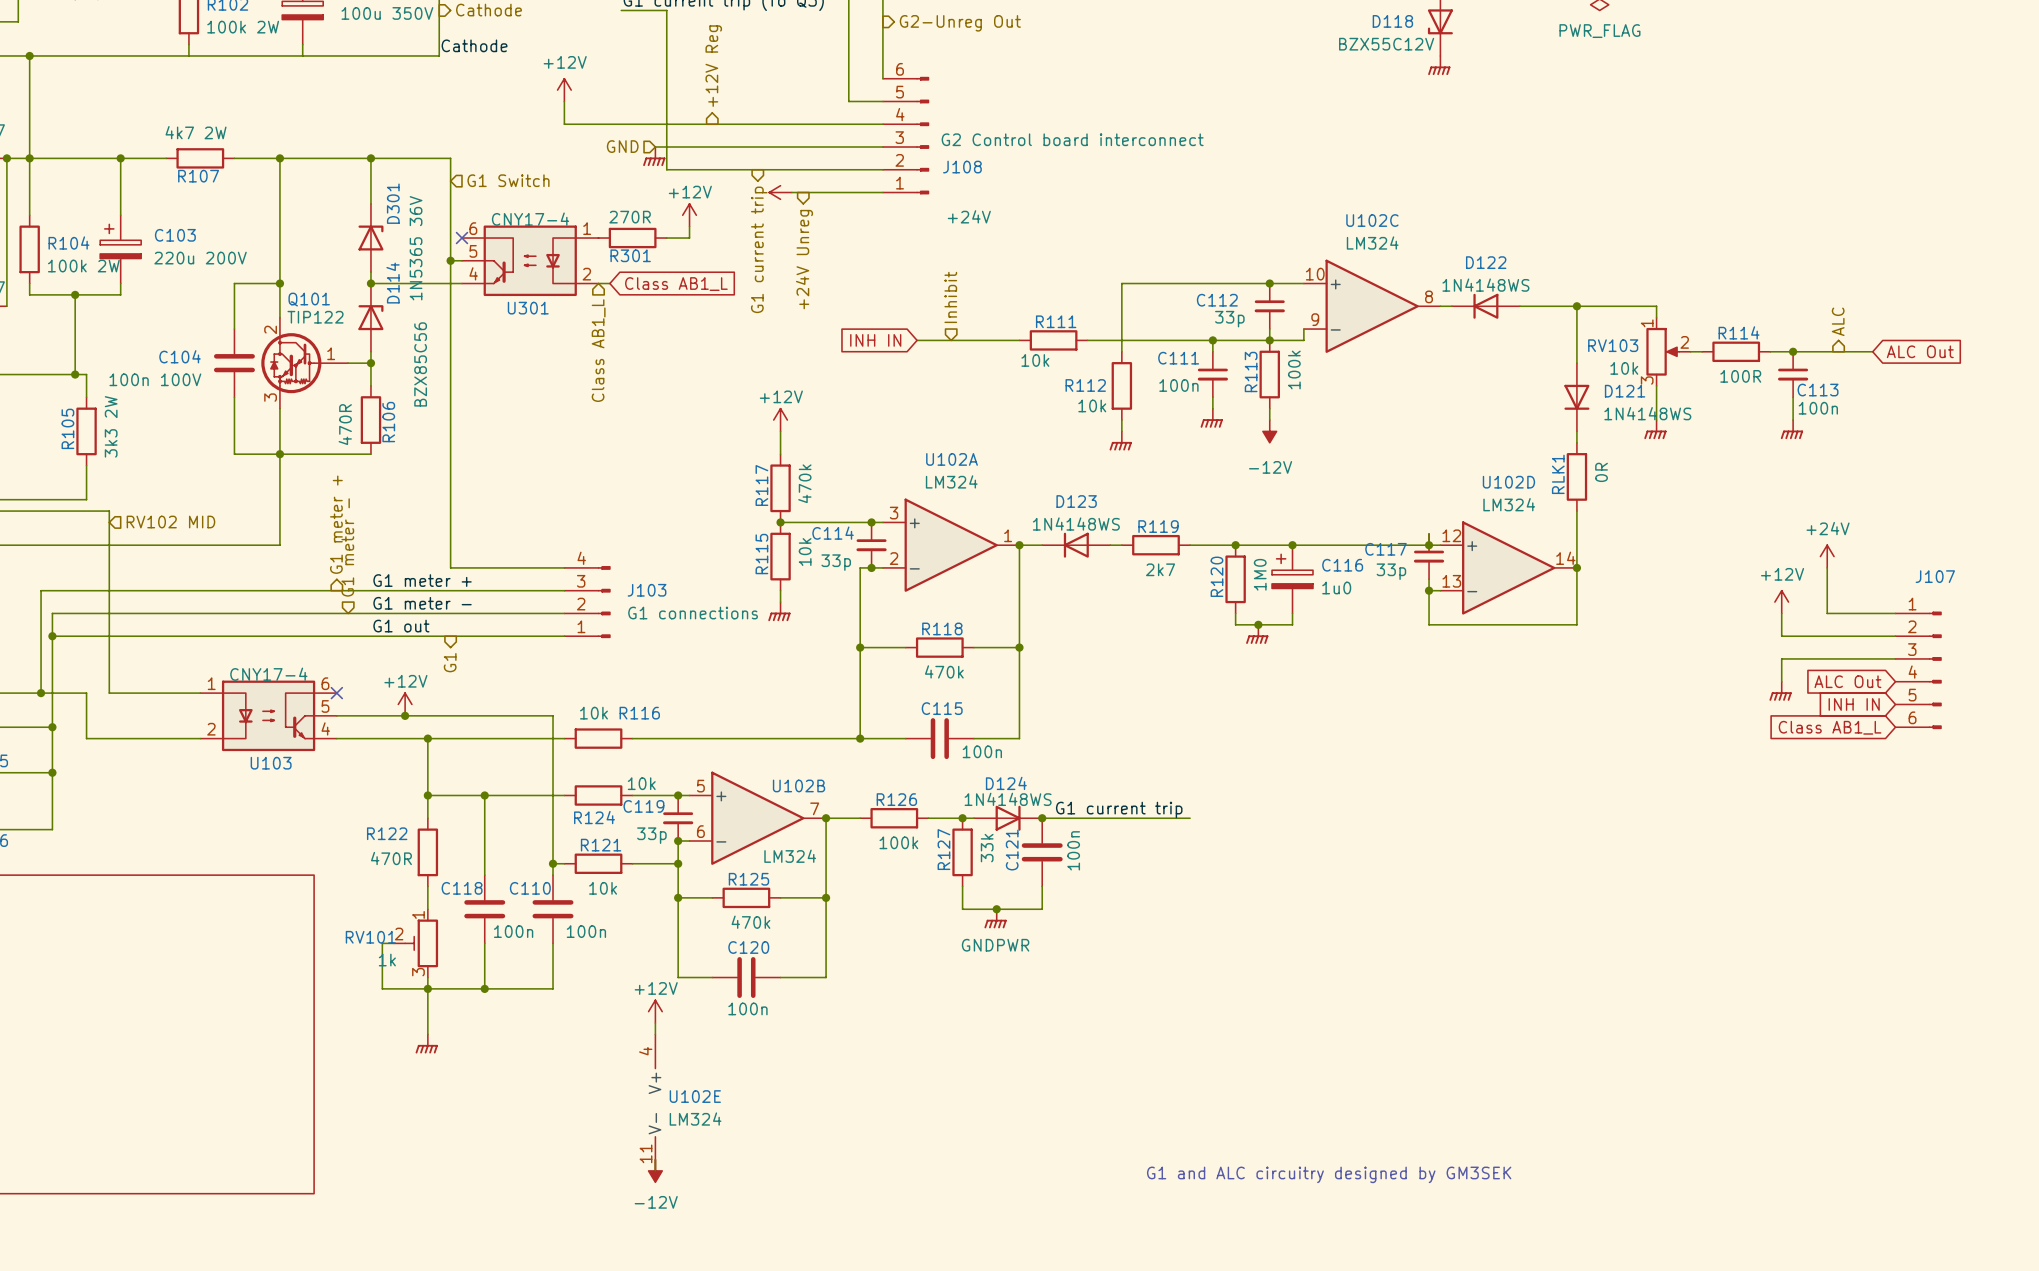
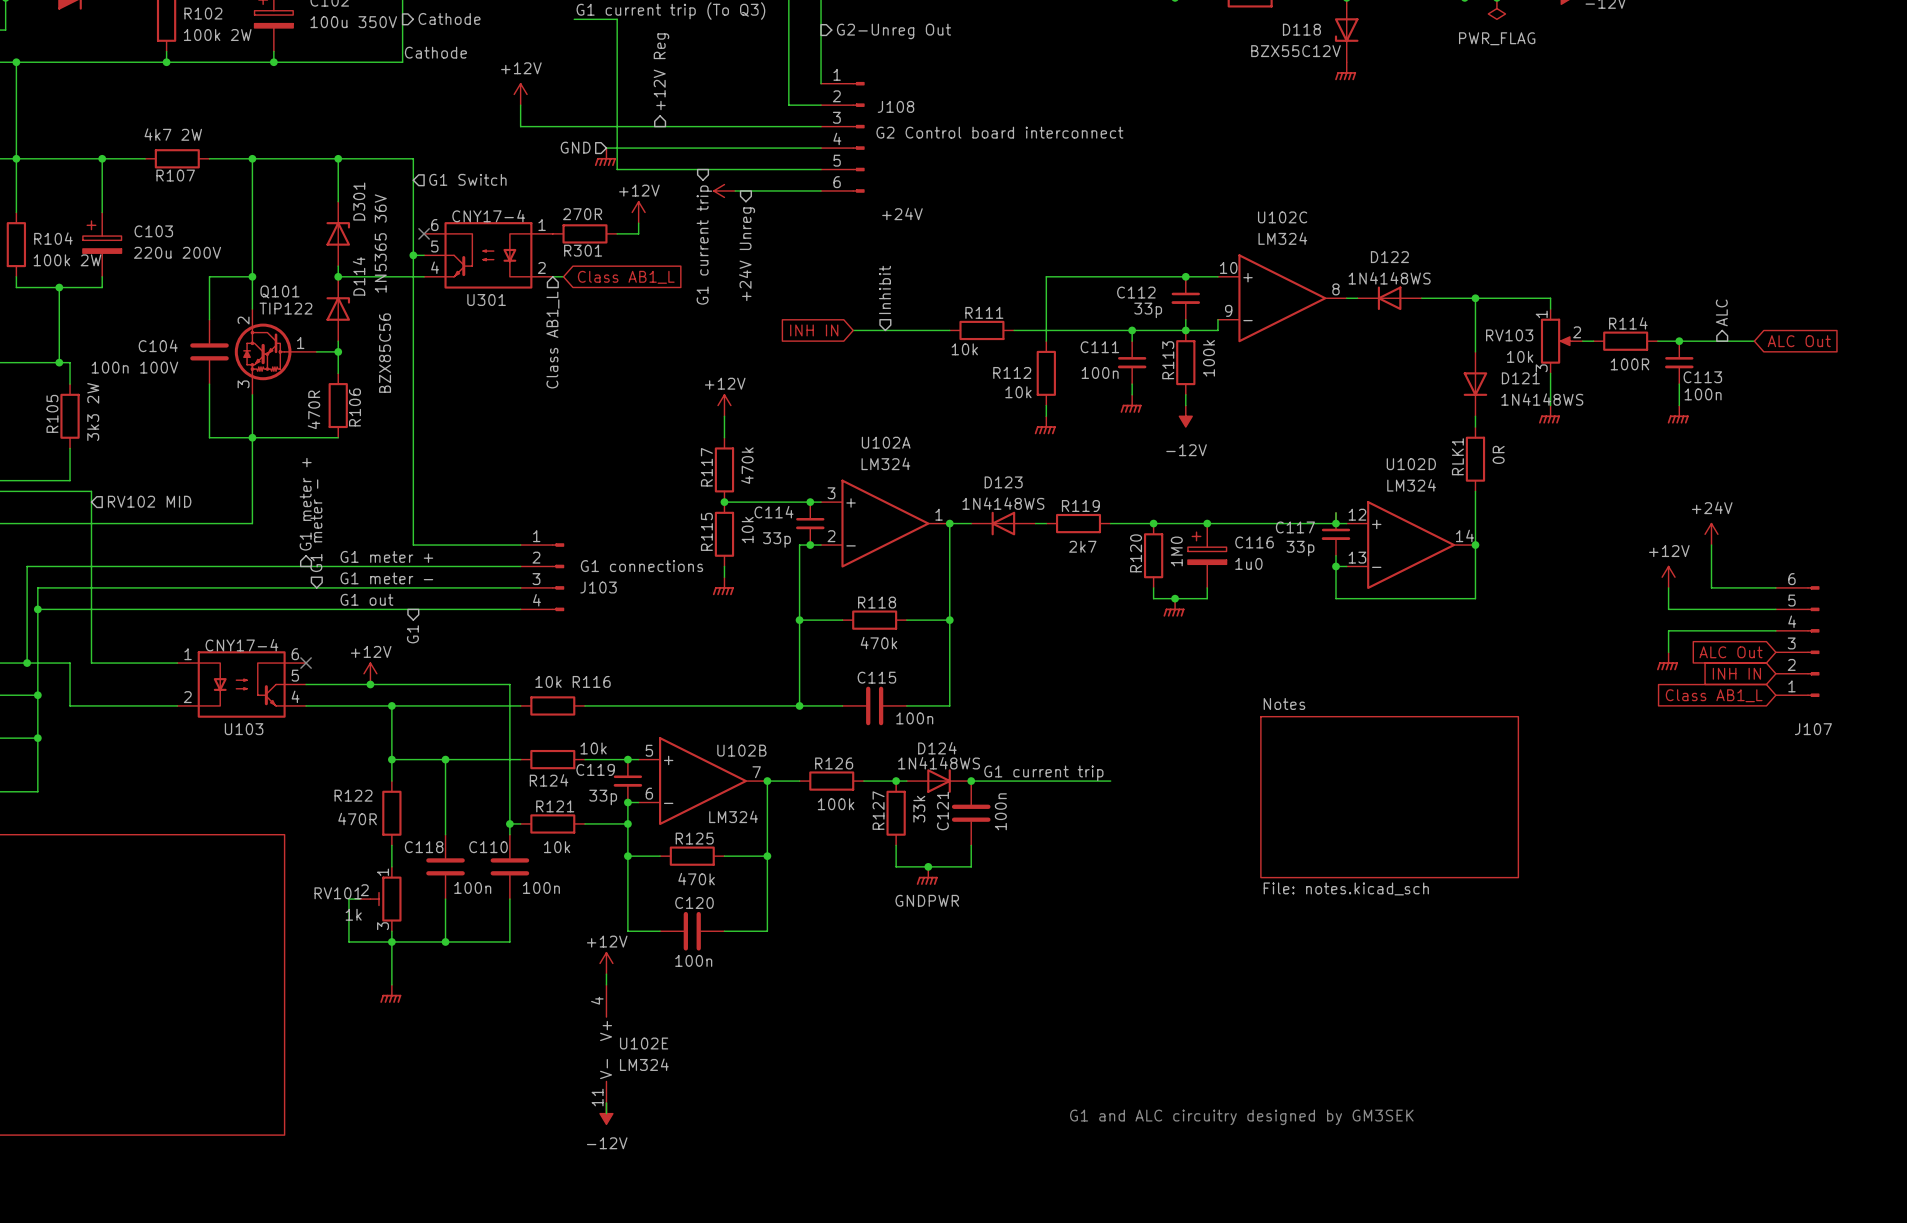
junction: none -> (166, 62)
junction: none -> (273, 62)
J108 flip: as is (922, 135) -> up-down (858, 137)
J103 flip: as is (604, 602) -> up-down (558, 577)
J107 flip: as is (1935, 670) -> up-down (1813, 641)
sheet Notes: none -> File: notes.kicad_sch (1389, 797)

